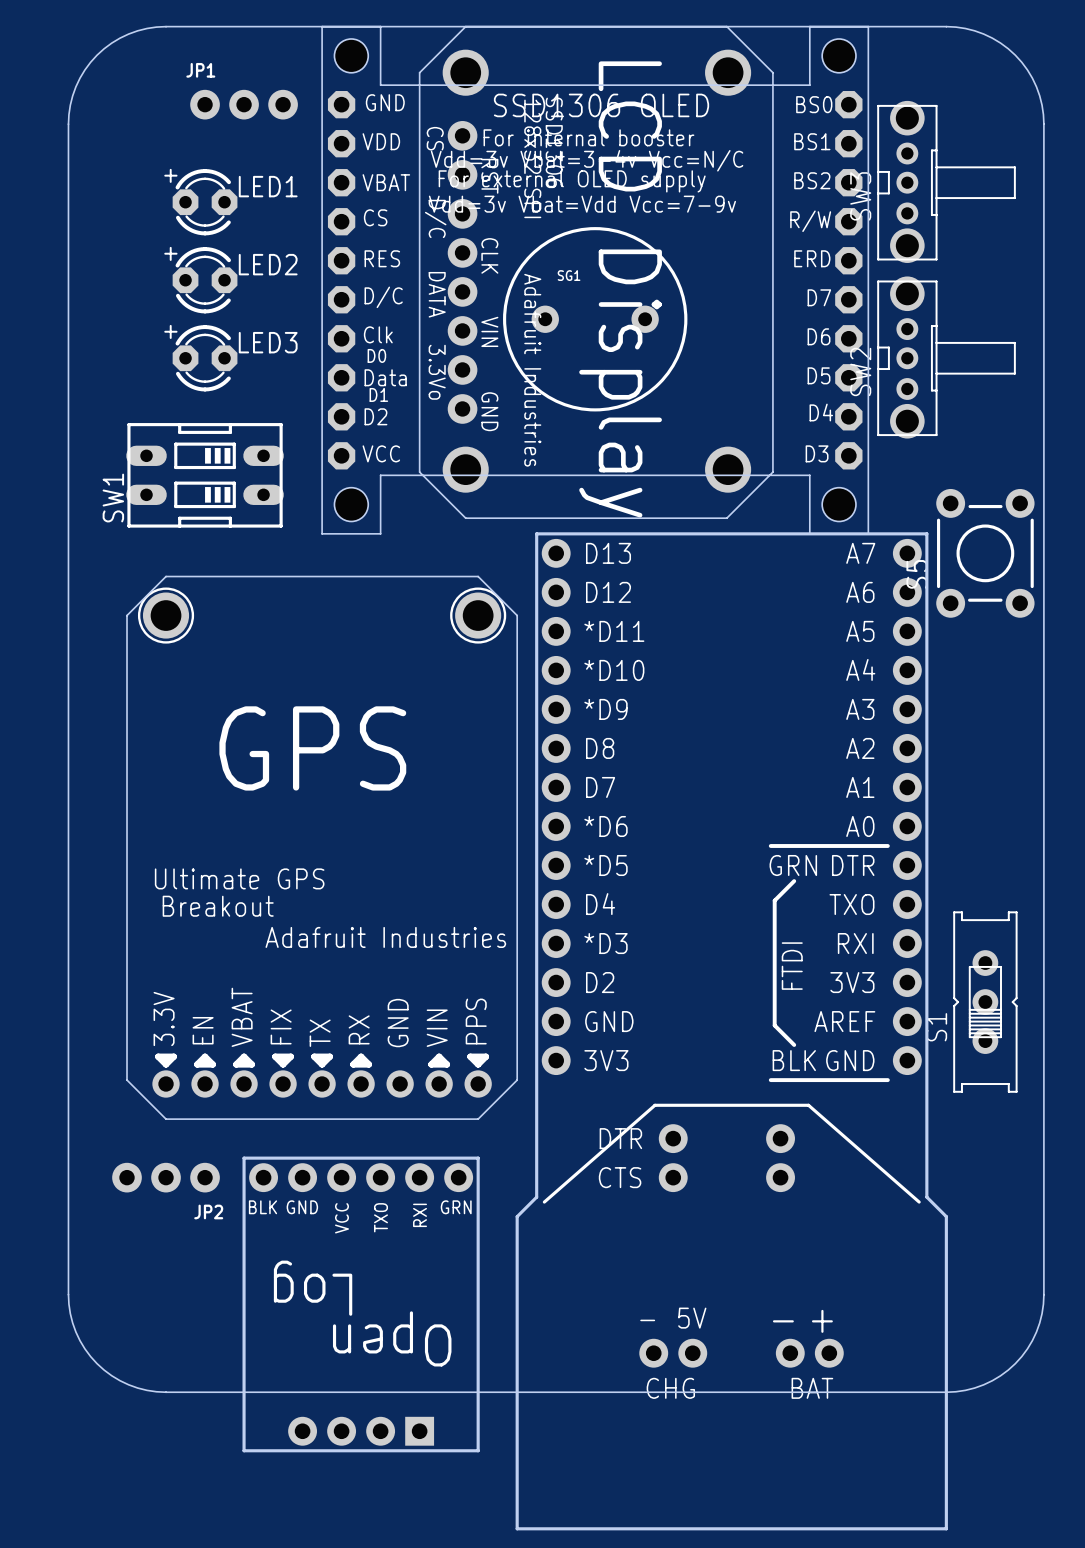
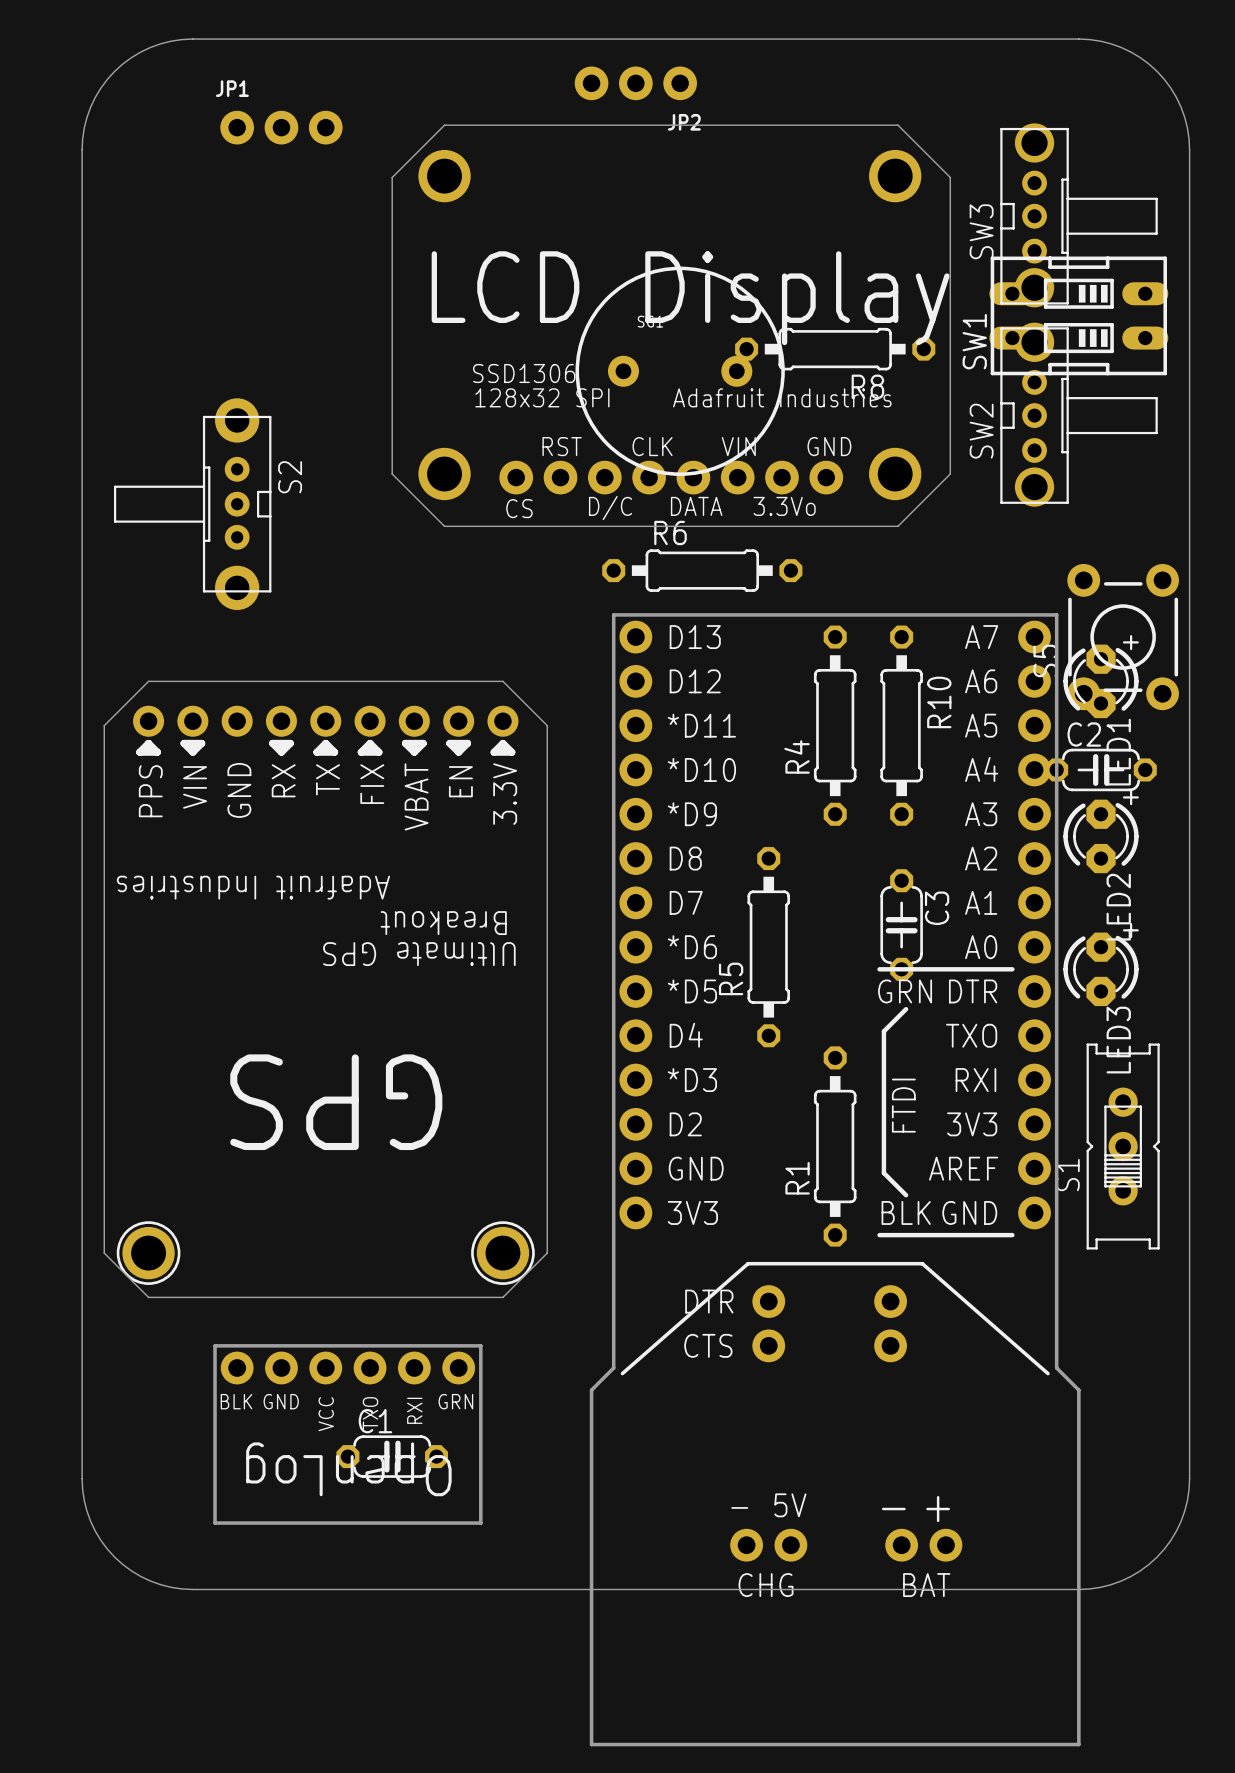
LED1 rotation: 0° (200, 202) -> 90° clockwise (1101, 676)
LED1 position: (200, 202) -> (1101, 676)
part rotation: 0° (596, 272) -> 90° counterclockwise (671, 325)
LED2 rotation: 0° (200, 280) -> 90° clockwise (1101, 831)
LED2 position: (200, 280) -> (1101, 831)
part: (595, 280) -> none
R8: none -> (835, 349)
LED3 rotation: 0° (200, 358) -> 90° clockwise (1101, 964)
LED3 position: (200, 358) -> (1101, 964)
S2: none -> (192, 504)
SW1 position: (205, 475) -> (1078, 315)
R6: none -> (702, 570)
R4: none -> (835, 725)
R10: none -> (901, 725)
C2: none -> (1100, 769)
C3: none -> (901, 925)
R5: none -> (768, 947)
part: (322, 847) -> none
part: none -> (325, 989)
R1: none -> (835, 1146)
JP2 position: (166, 1177) -> (635, 83)
part: none -> (347, 1434)
C1: none -> (392, 1456)
part: (361, 1304) -> none

